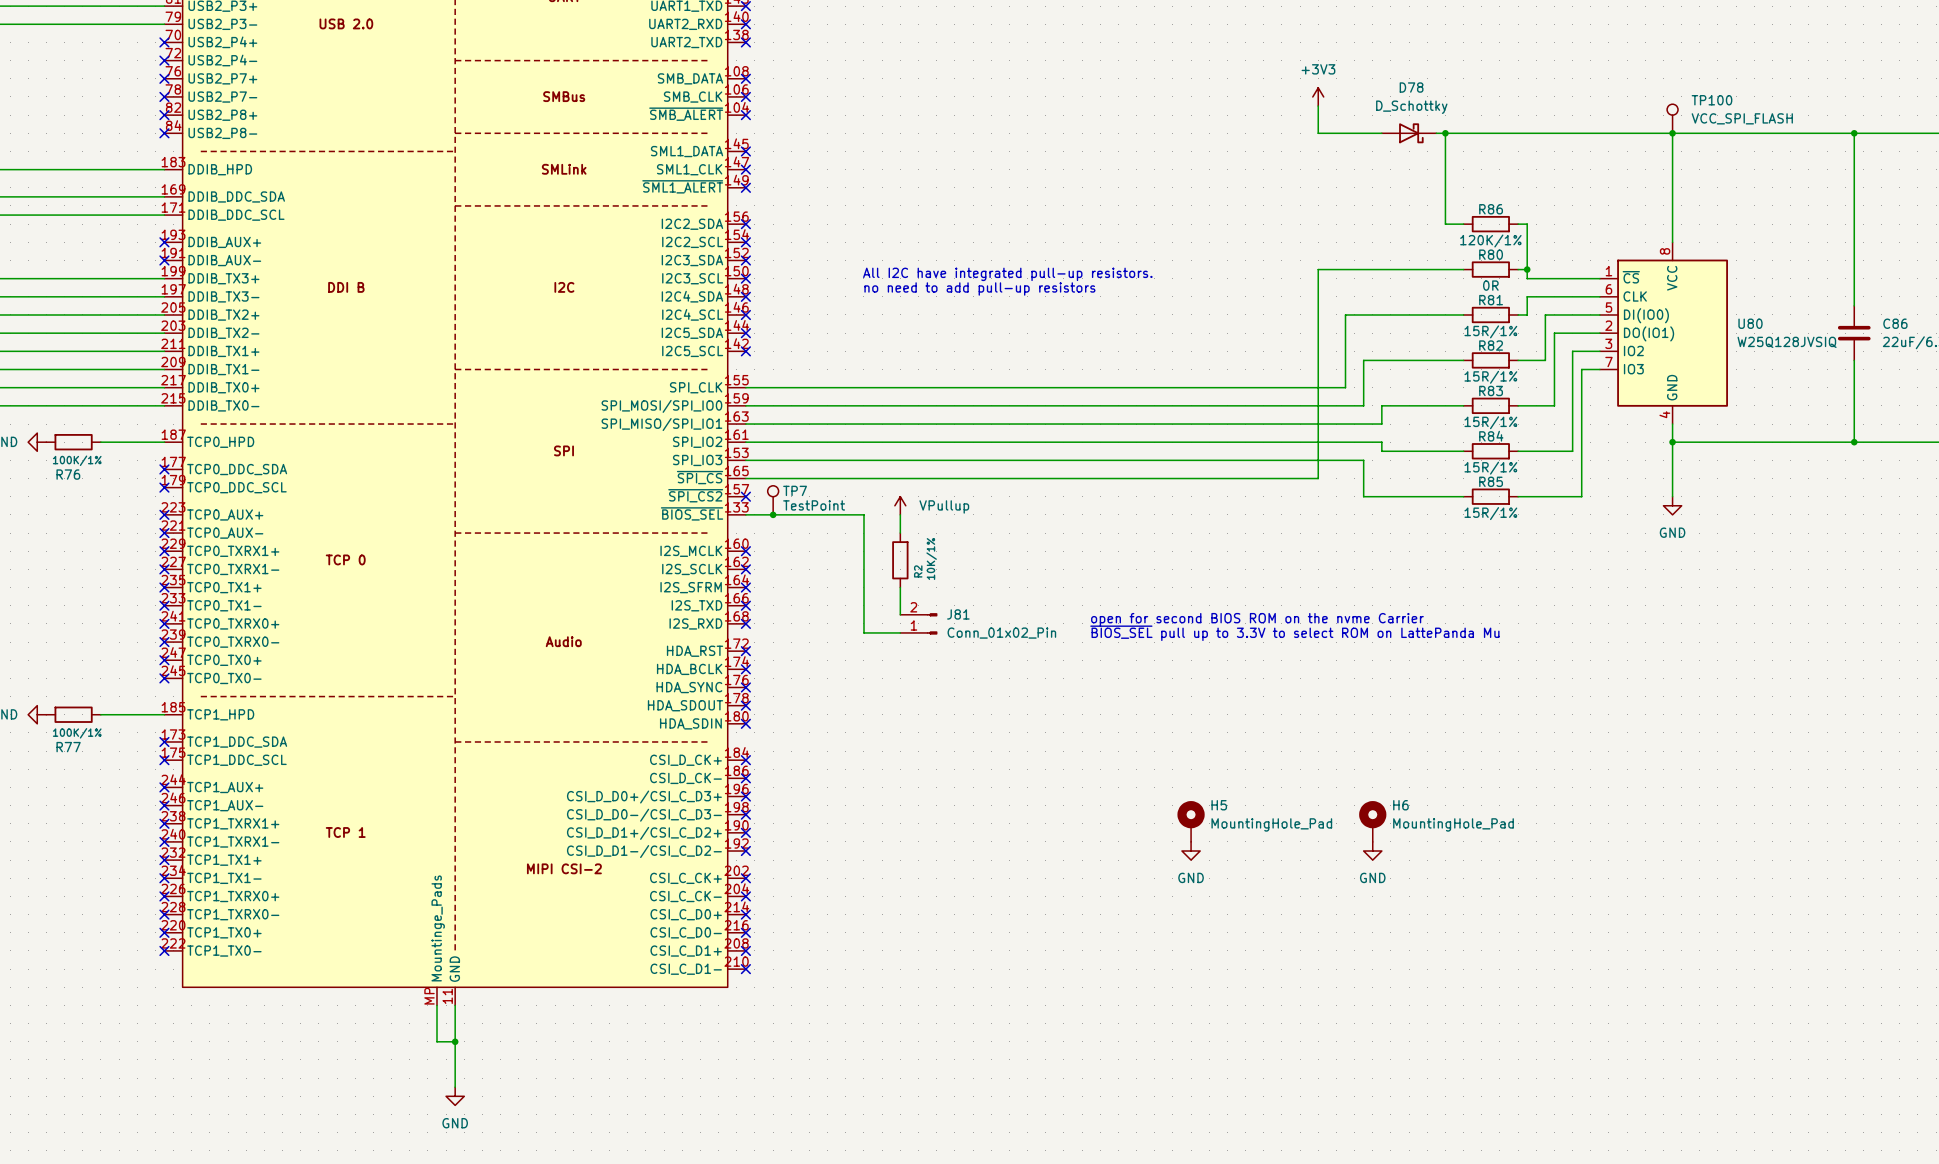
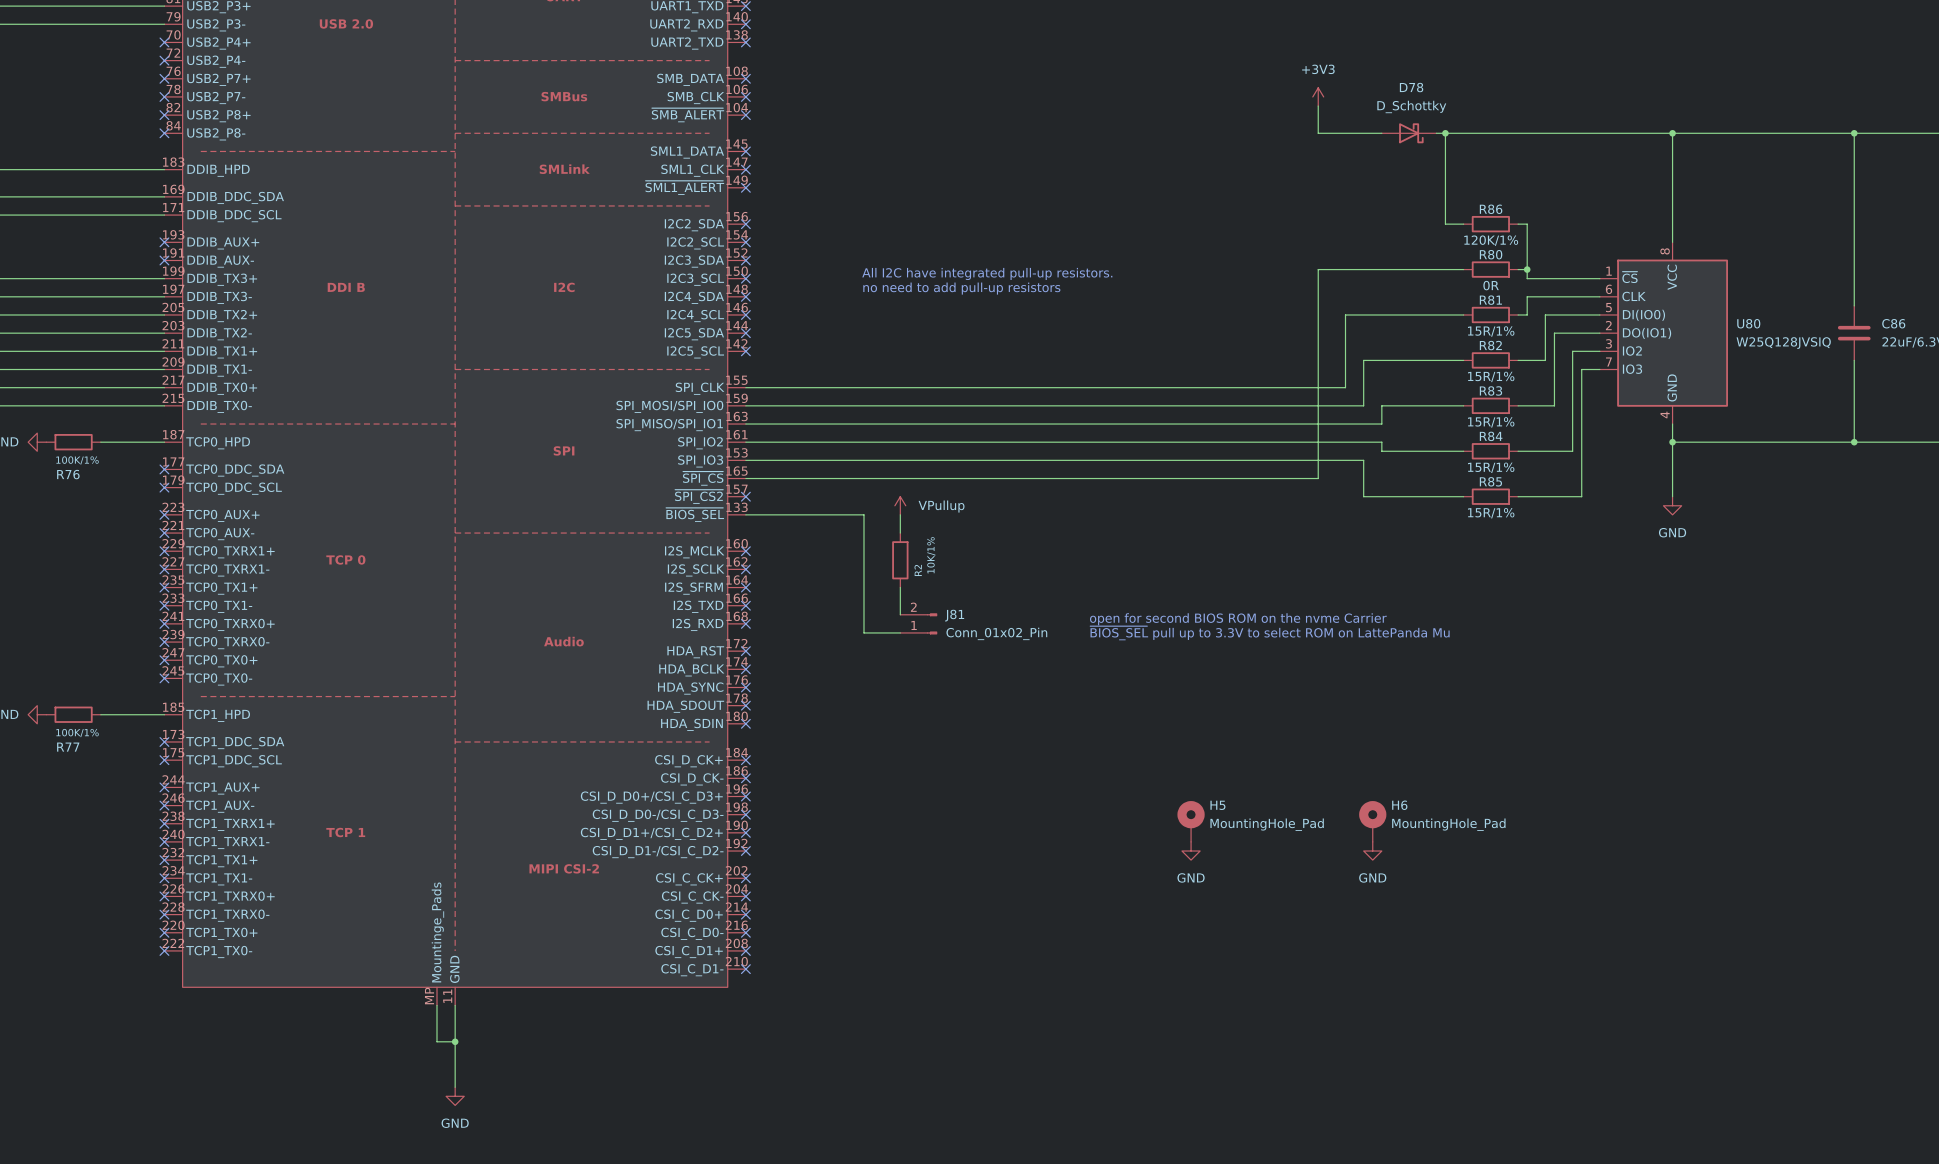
TP100: VCC_SPI_FLASH (1672, 118) -> none
TP7: TestPoint (773, 500) -> none
junction: (773, 514) -> none

